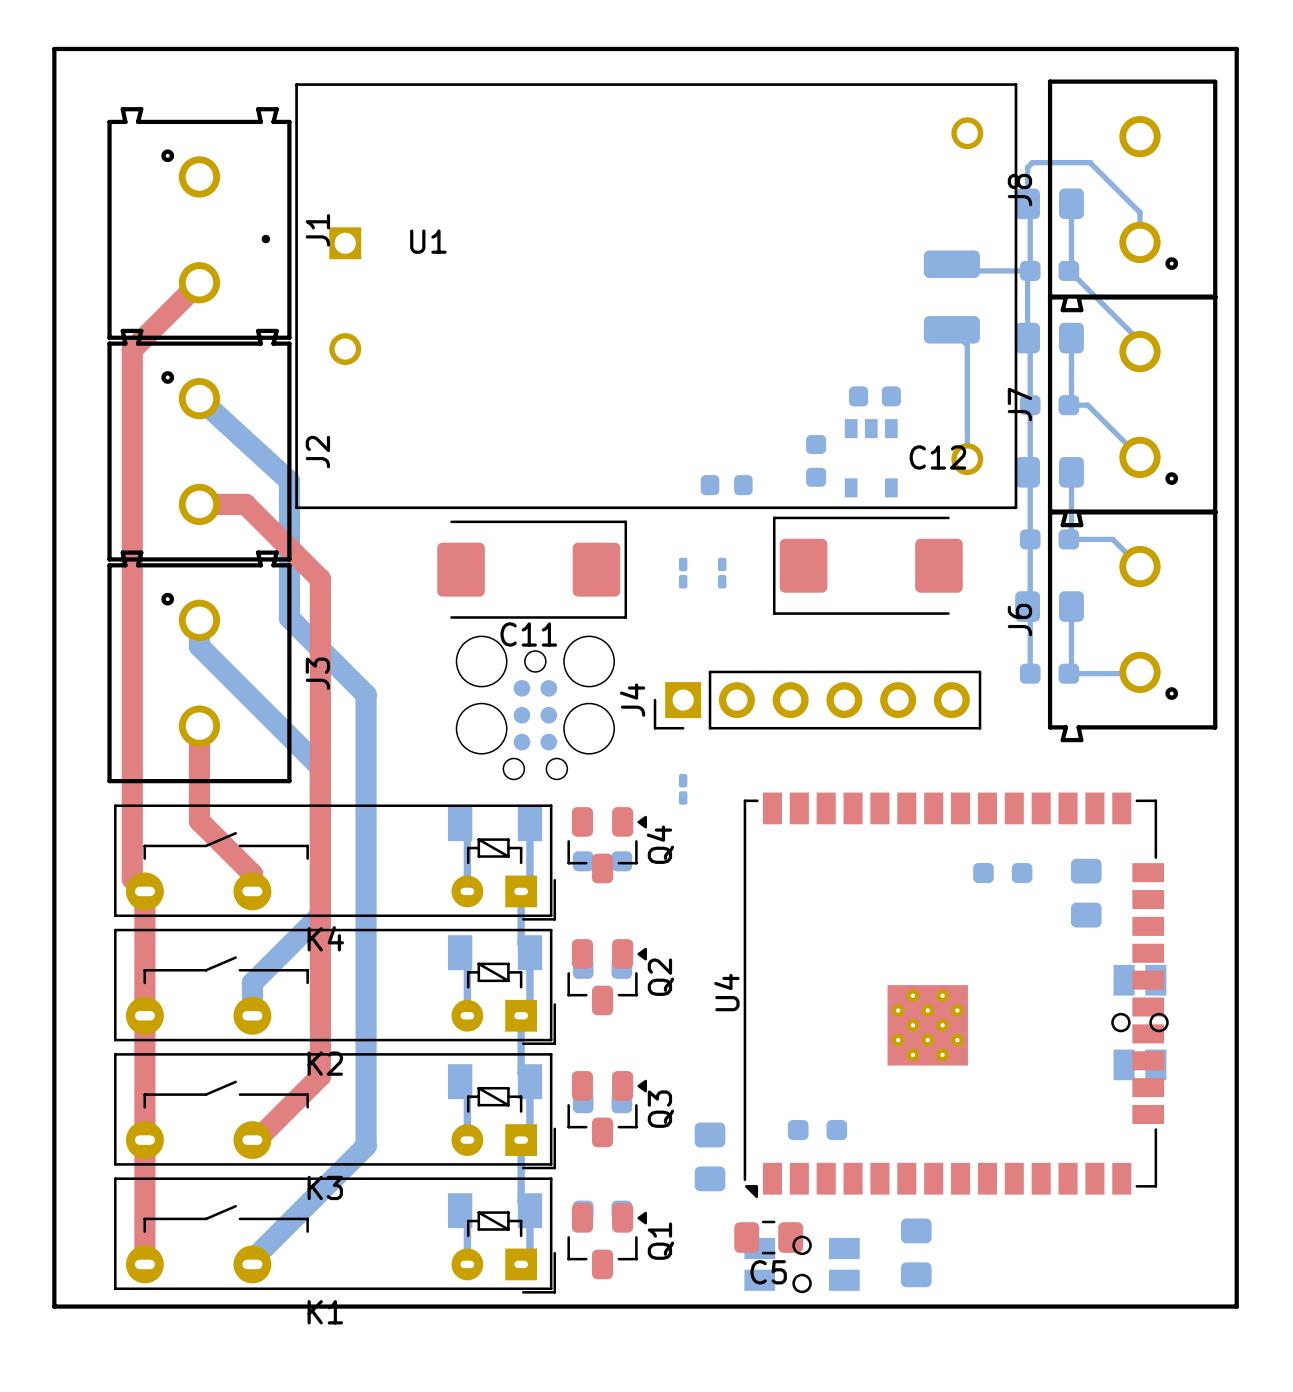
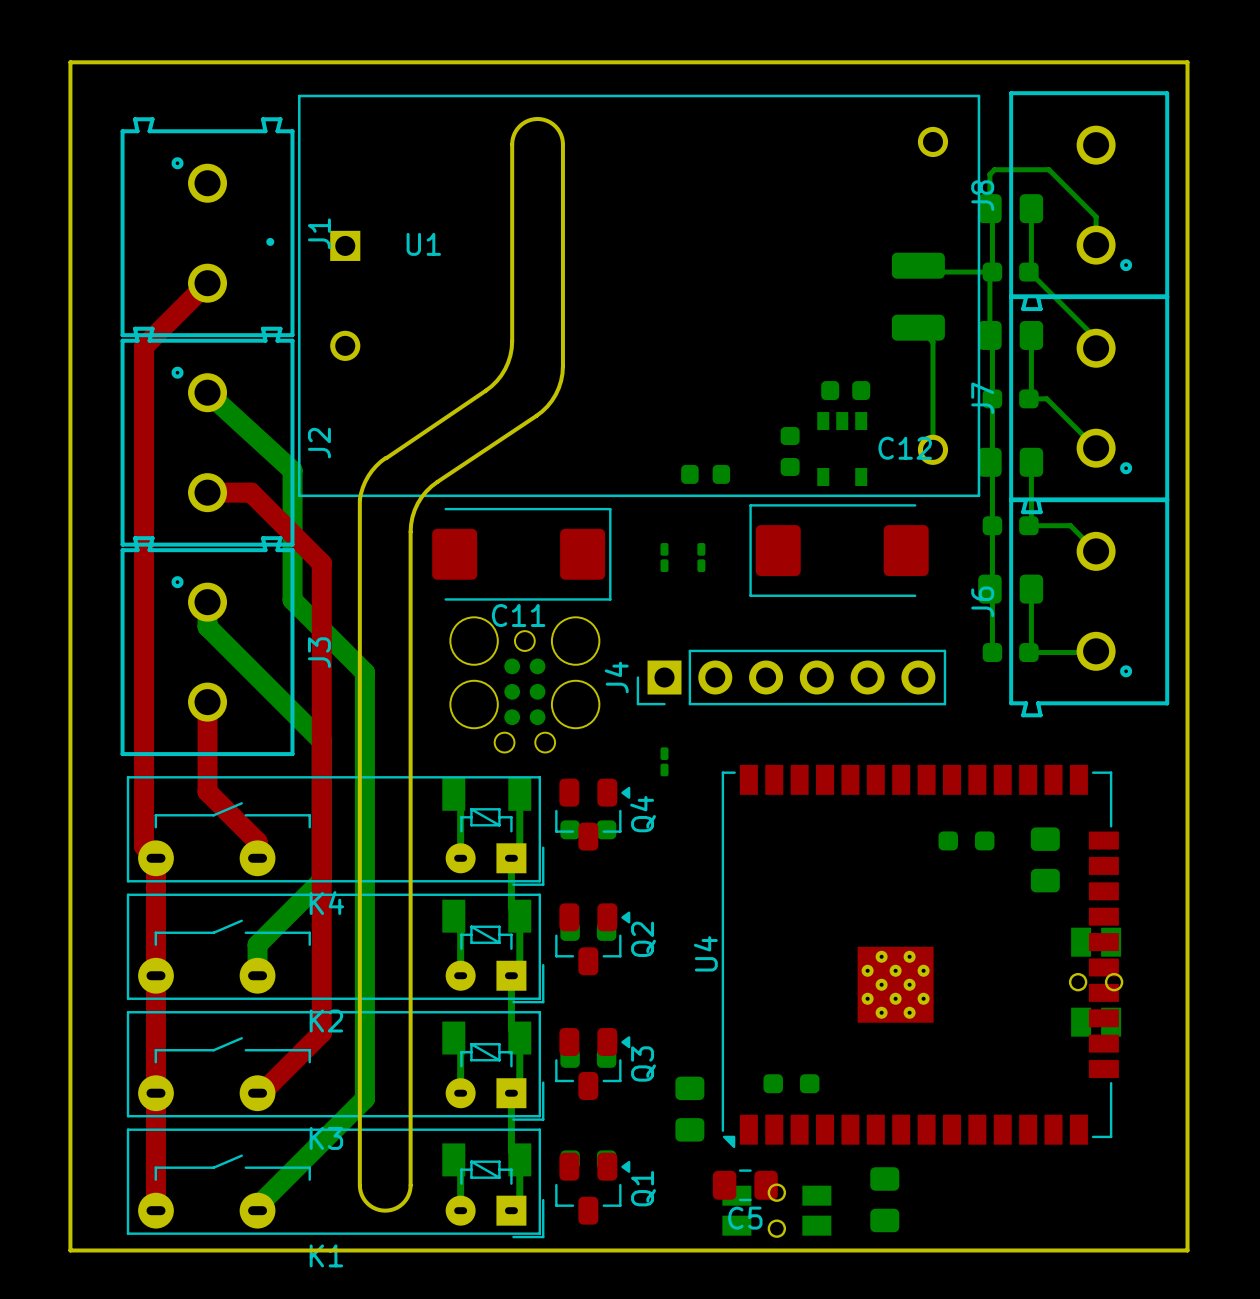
board edge: none -> (385, 457) (368, 476) (359, 499) (359, 1185) (362, 1197) (368, 1204) (376, 1209) (385, 1210) (394, 1209) (404, 1202) (408, 1194) (410, 1185) (411, 524) (417, 503) (431, 486) (542, 411) (551, 400) (558, 387) (562, 366) (562, 144) (559, 131) (547, 120) (534, 119) (524, 122) (517, 128) (512, 141) (512, 341) (510, 355) (505, 369) (496, 381) (485, 390) (386, 458)

